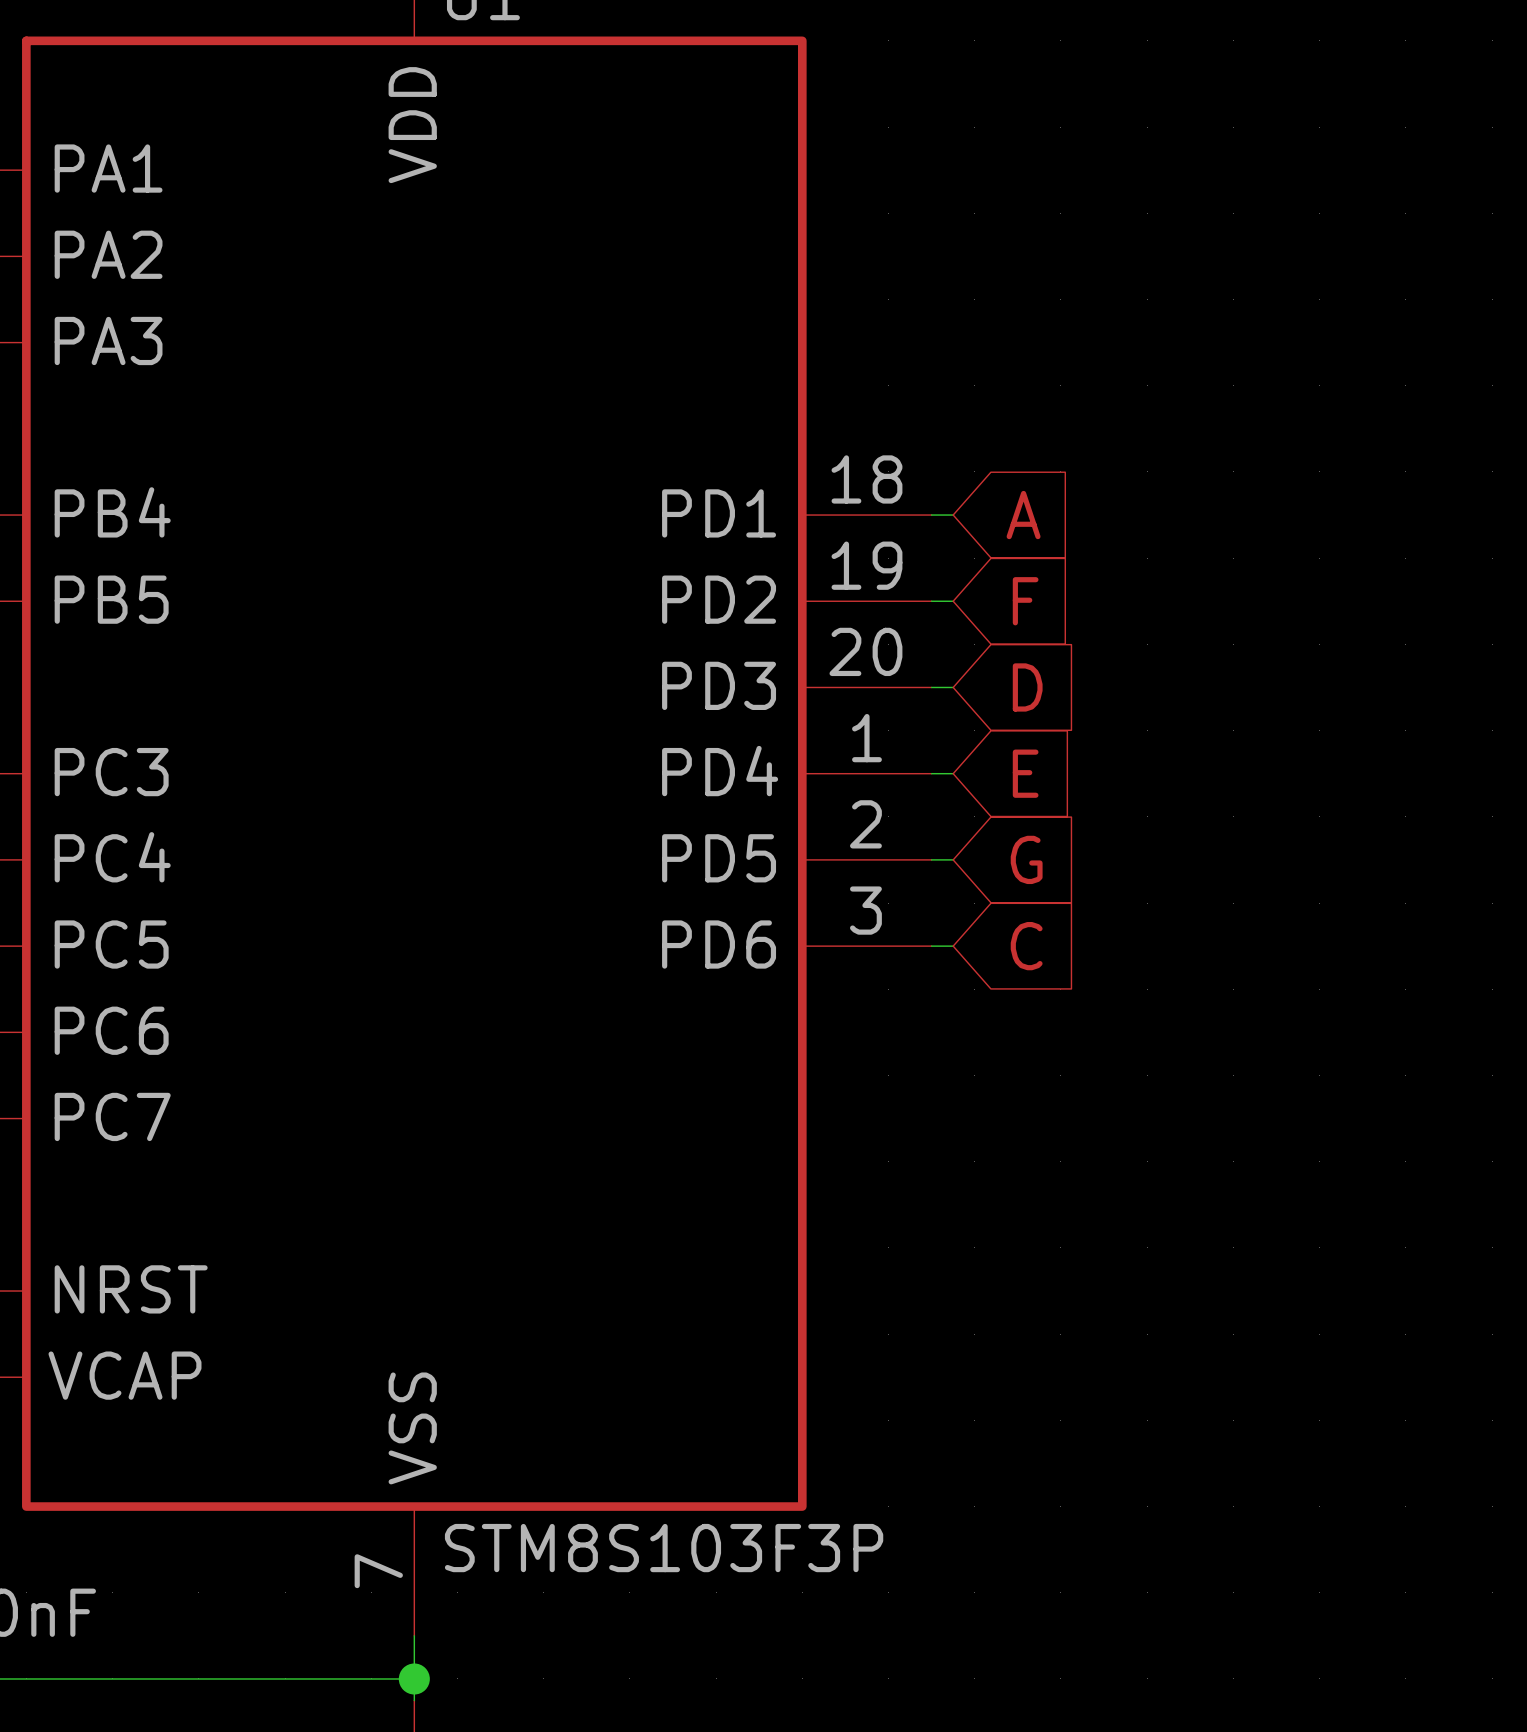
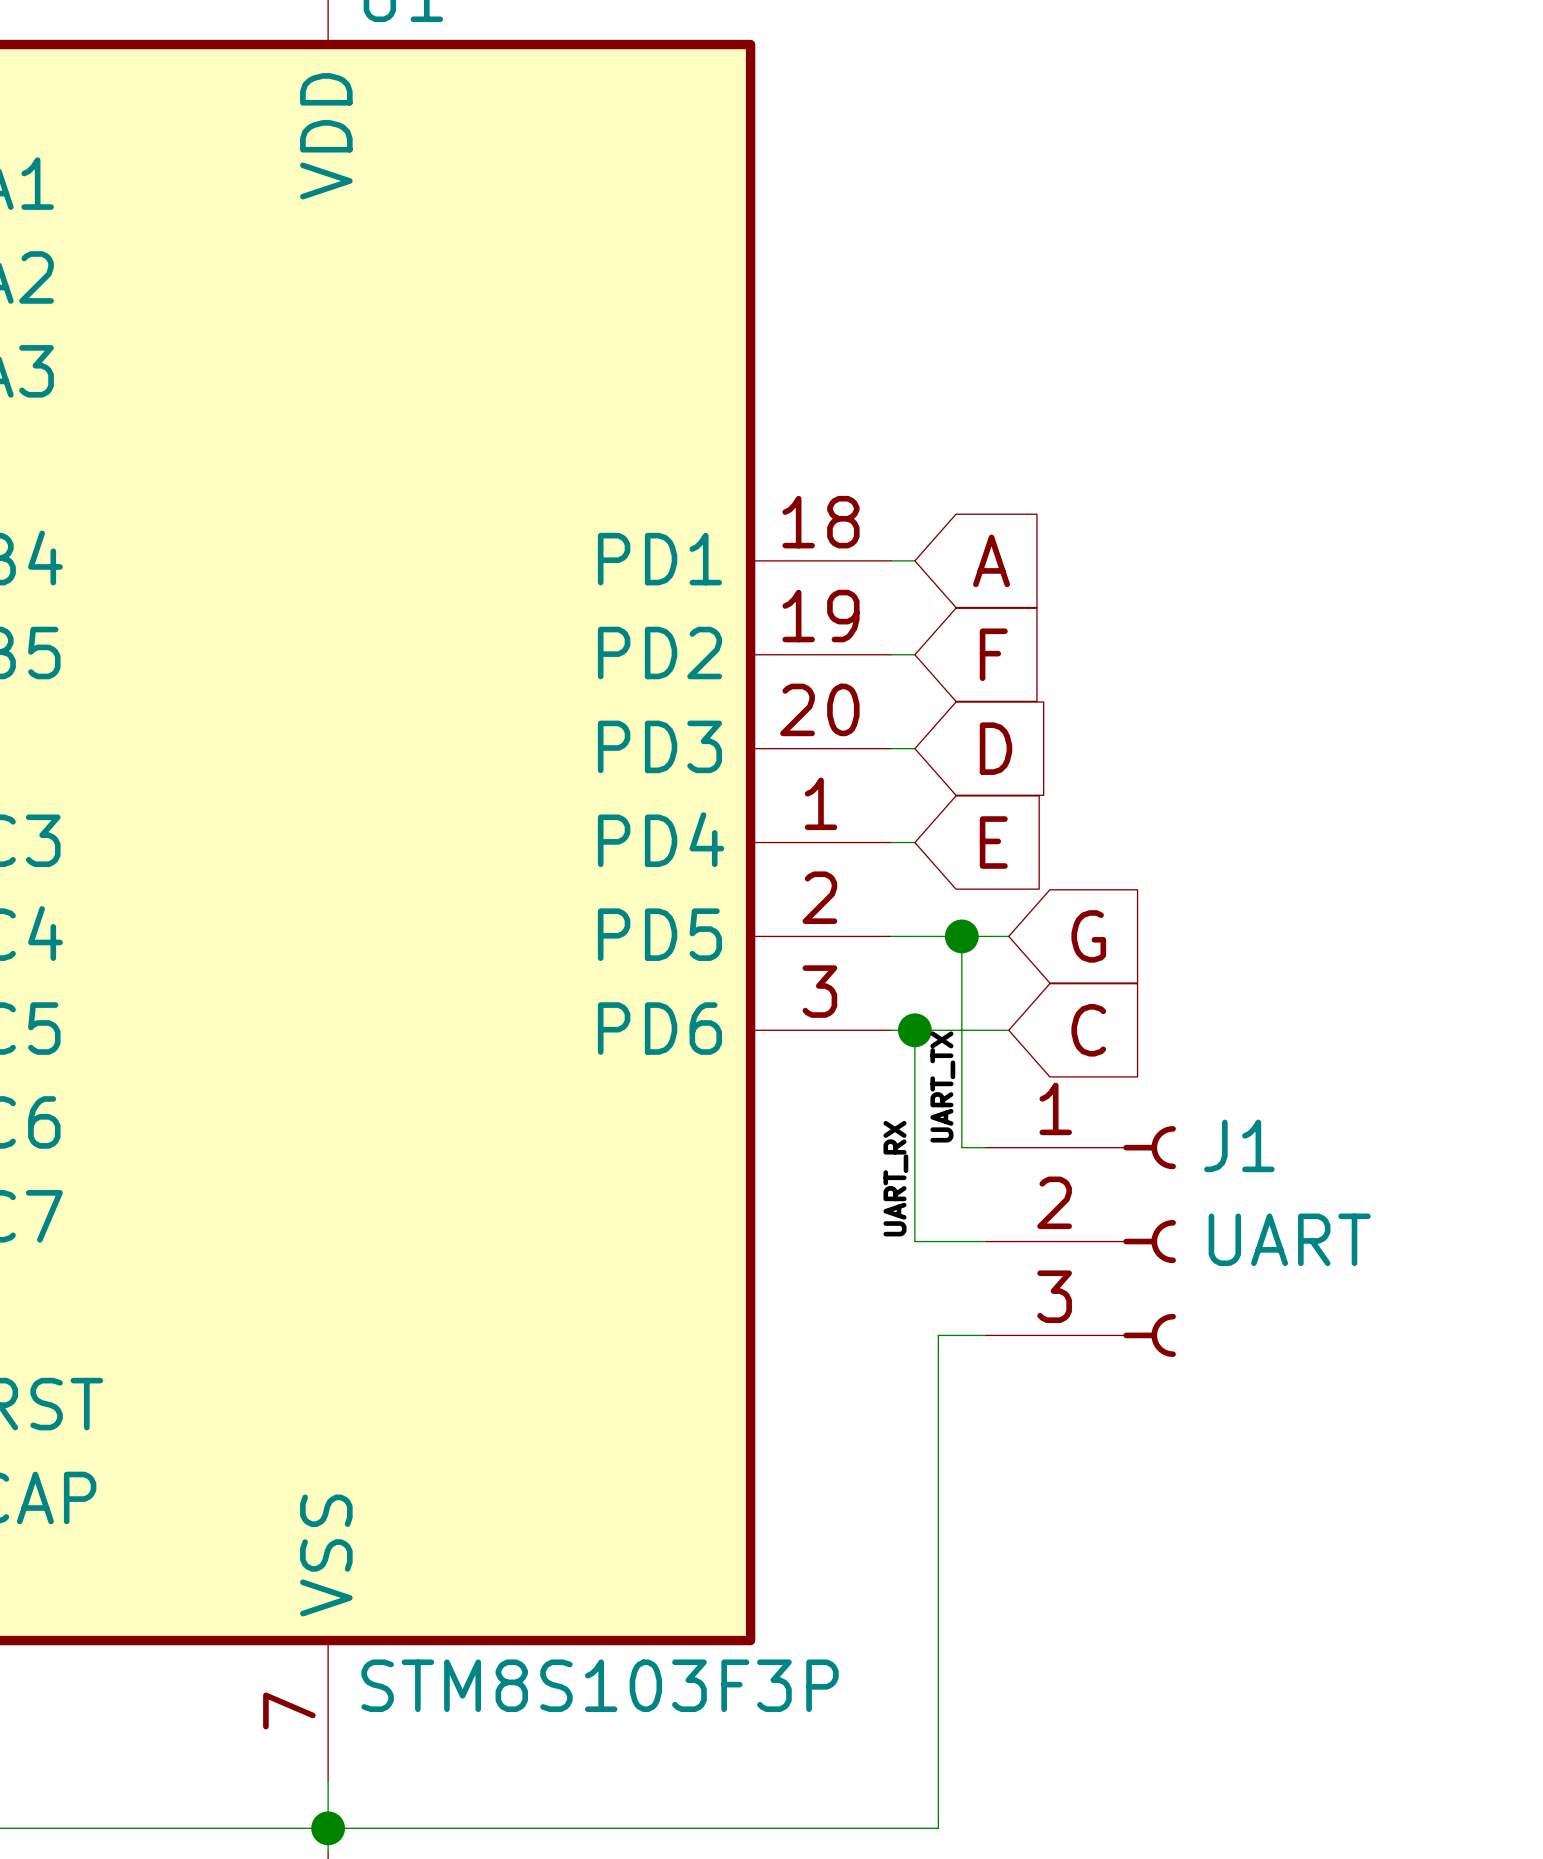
wire: none -> (914, 936) (1008, 936)
wire: none -> (961, 936) (961, 1147) (985, 1147)
junction: none -> (961, 936)
global label position: G (1026, 859) -> G (1088, 936)
junction: none -> (914, 1030)
global label position: C (1026, 946) -> C (1088, 1030)
wire: none -> (1008, 1030) (914, 1030) (914, 1241) (985, 1241)
label: none -> UART_TX (942, 1086)
label: none -> UART_RX (895, 1178)
J1: none -> UART (1080, 1241)
wire: none -> (985, 1335) (938, 1335) (938, 1828) (328, 1828)

